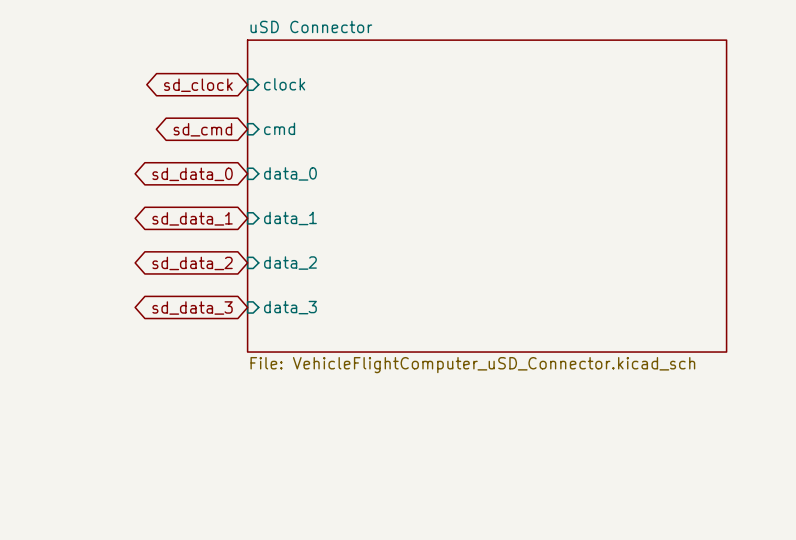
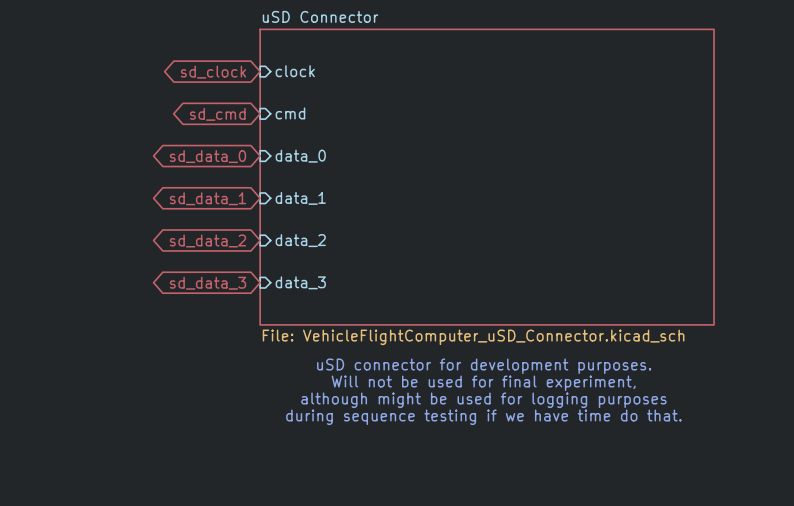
text: none -> uSD connector for development purposes. (484, 366)
text: none -> Will not be used for final experiment, (483, 383)
text: none -> although might be used for logging purposes (483, 400)
text: none -> during sequence testing if we have time do that. (483, 417)

